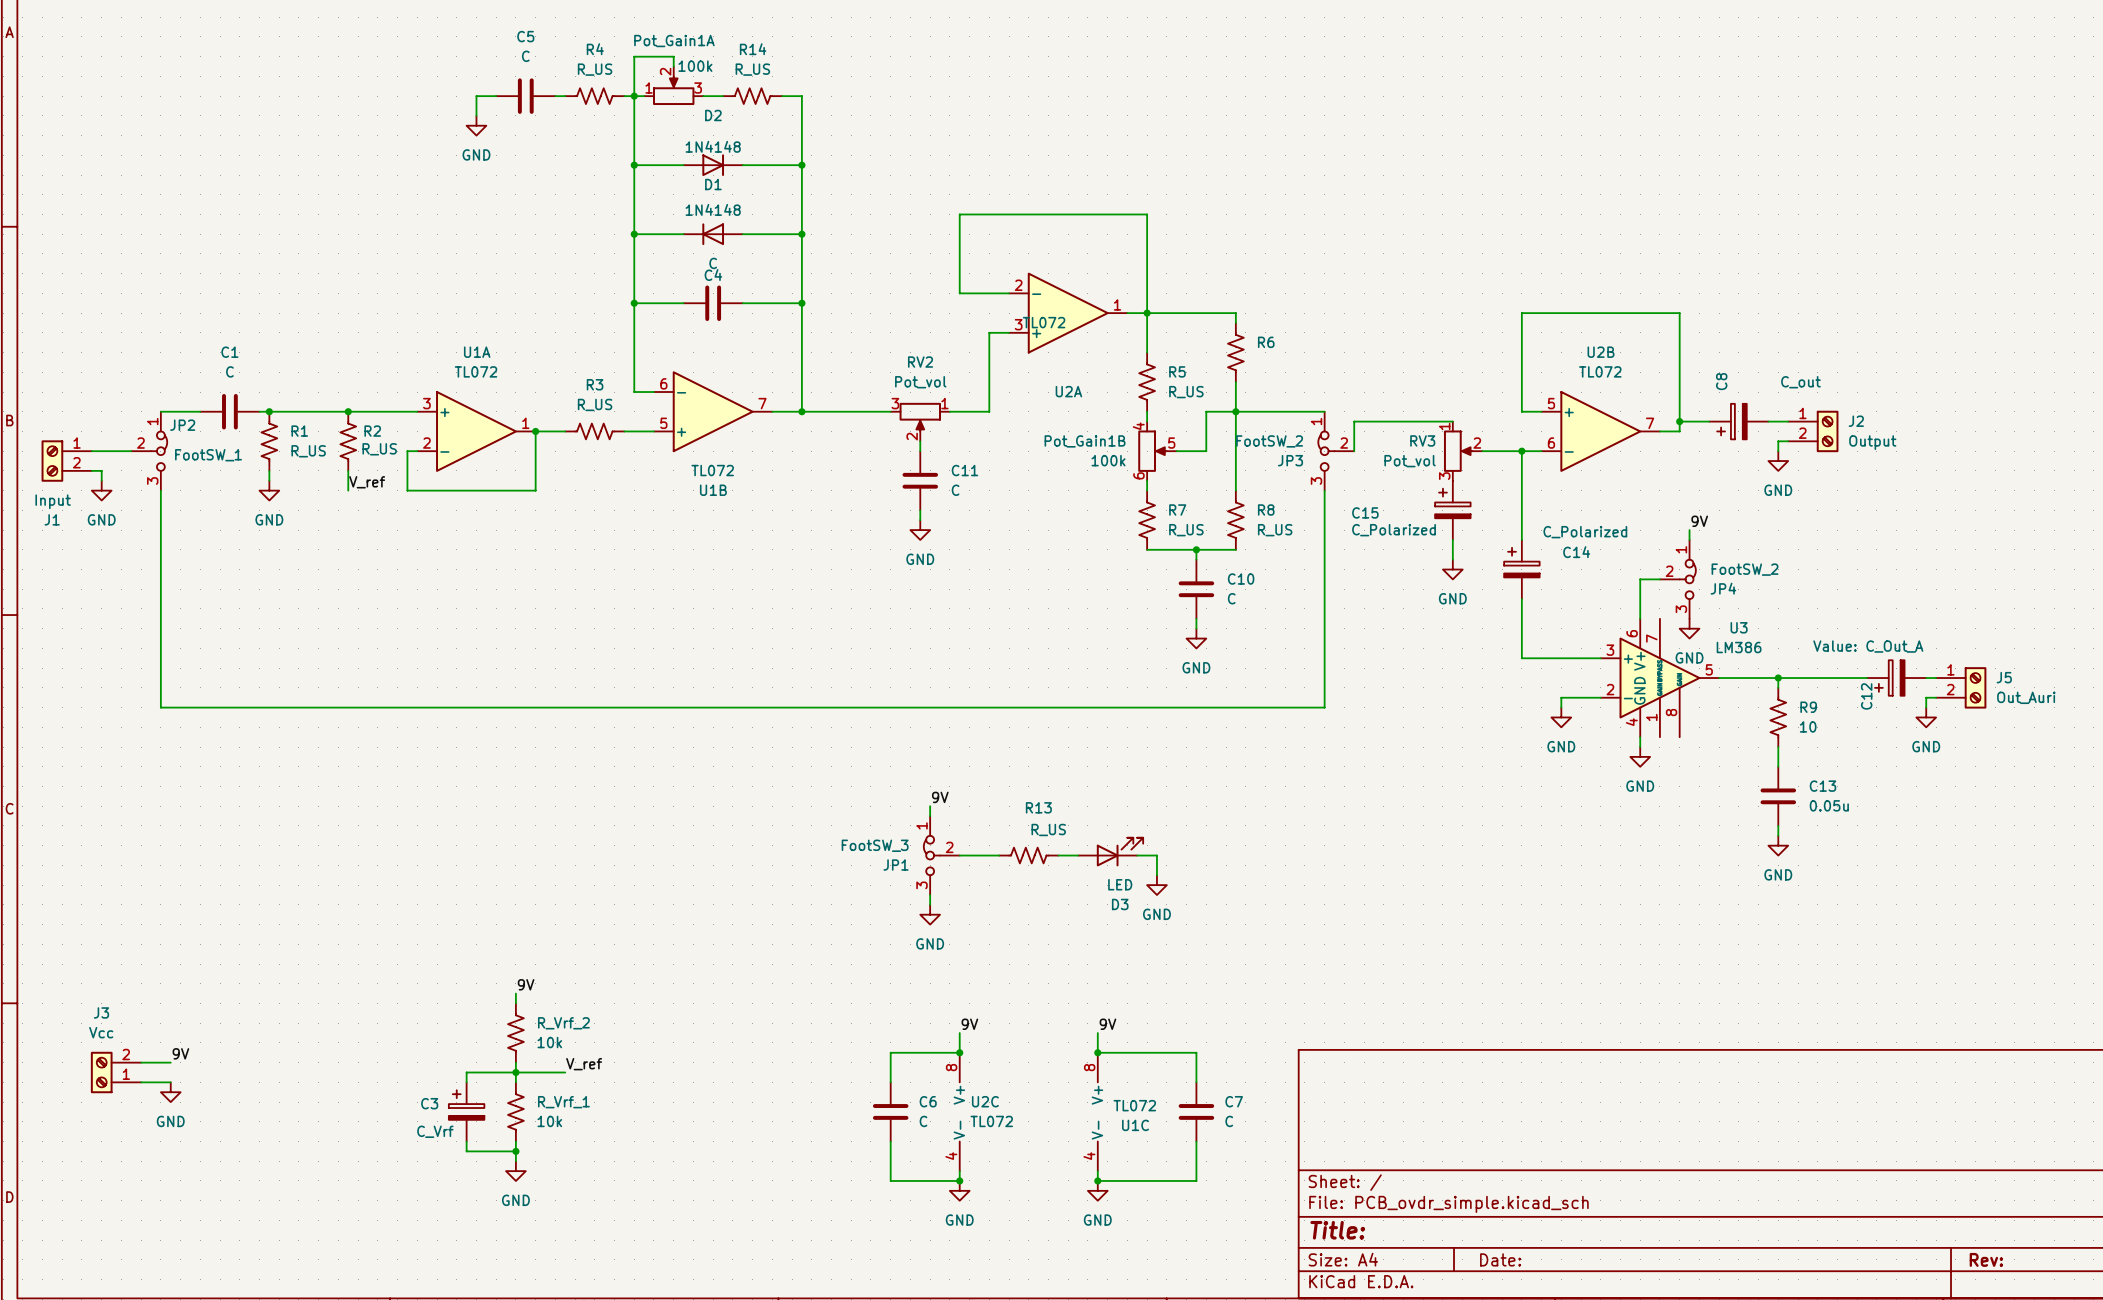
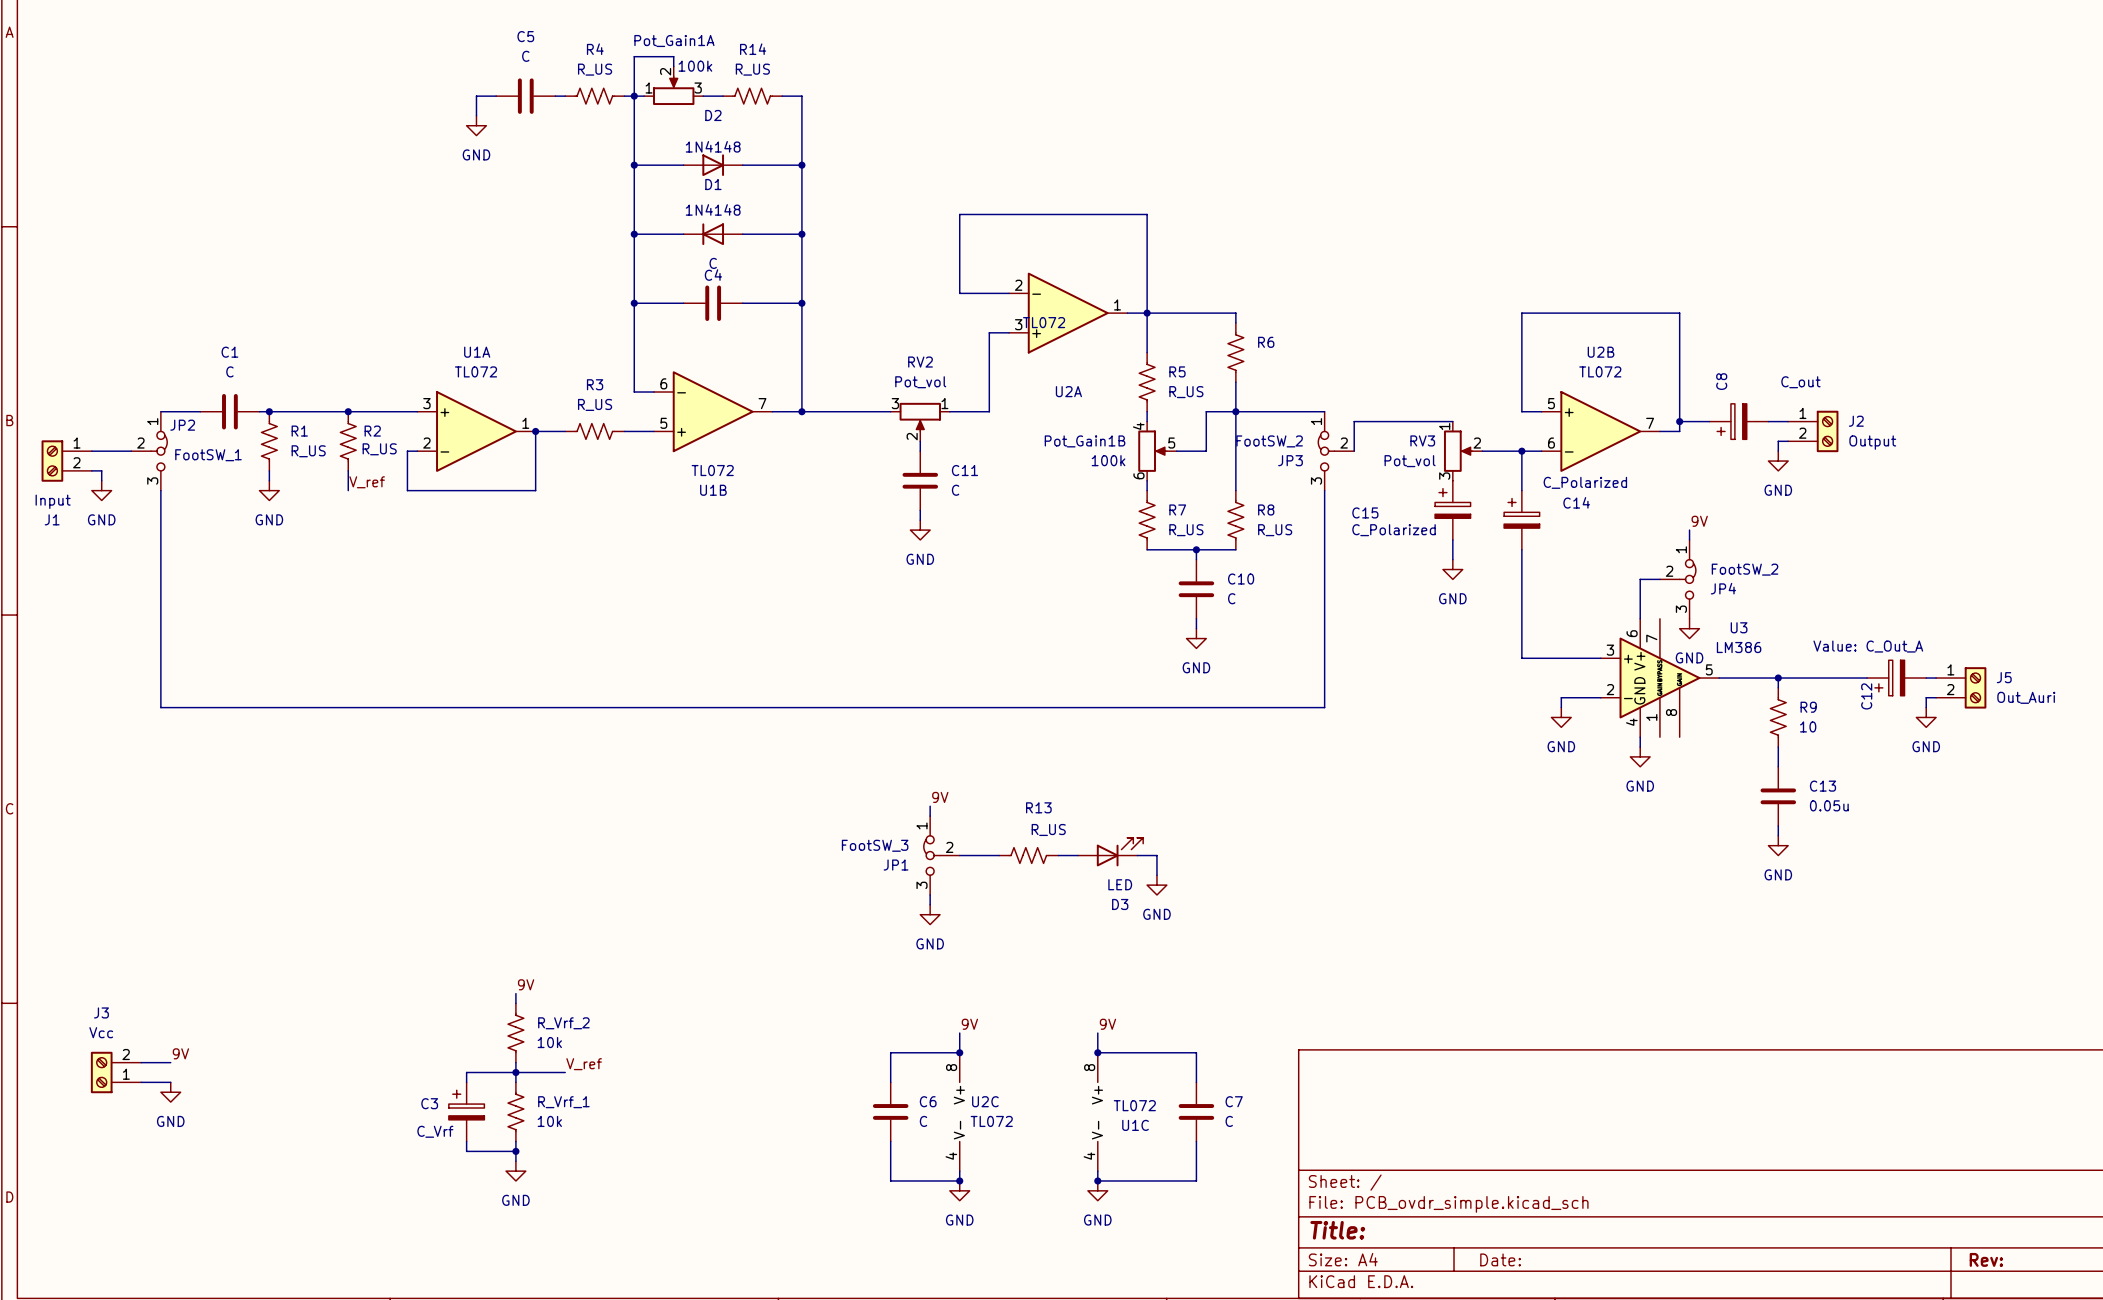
C14 position: (1521, 569) -> (1521, 520)

